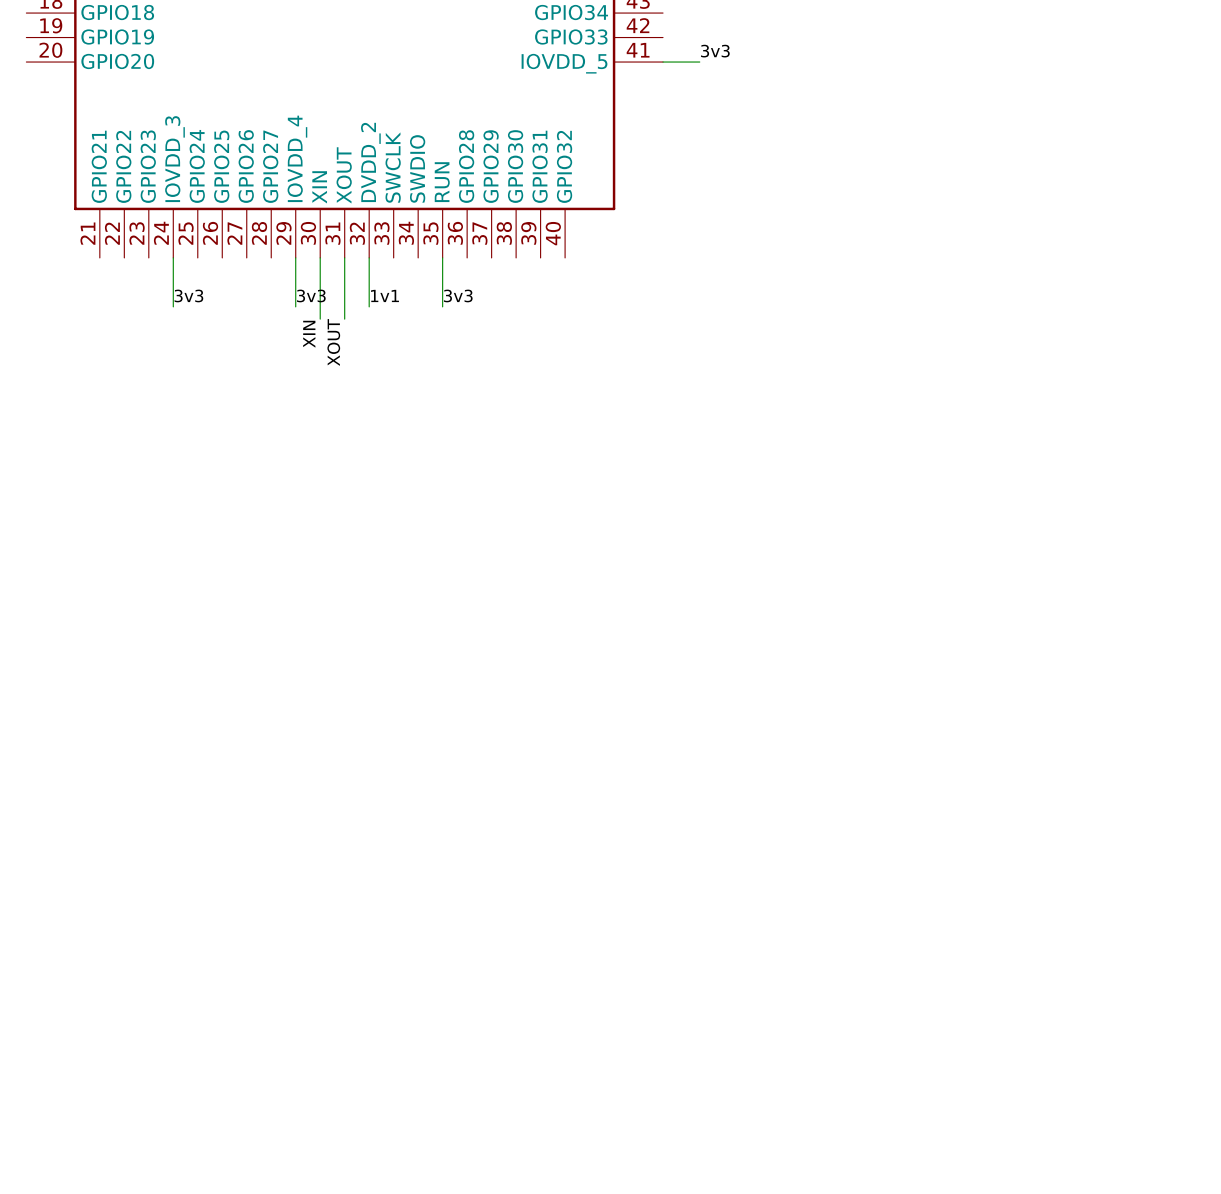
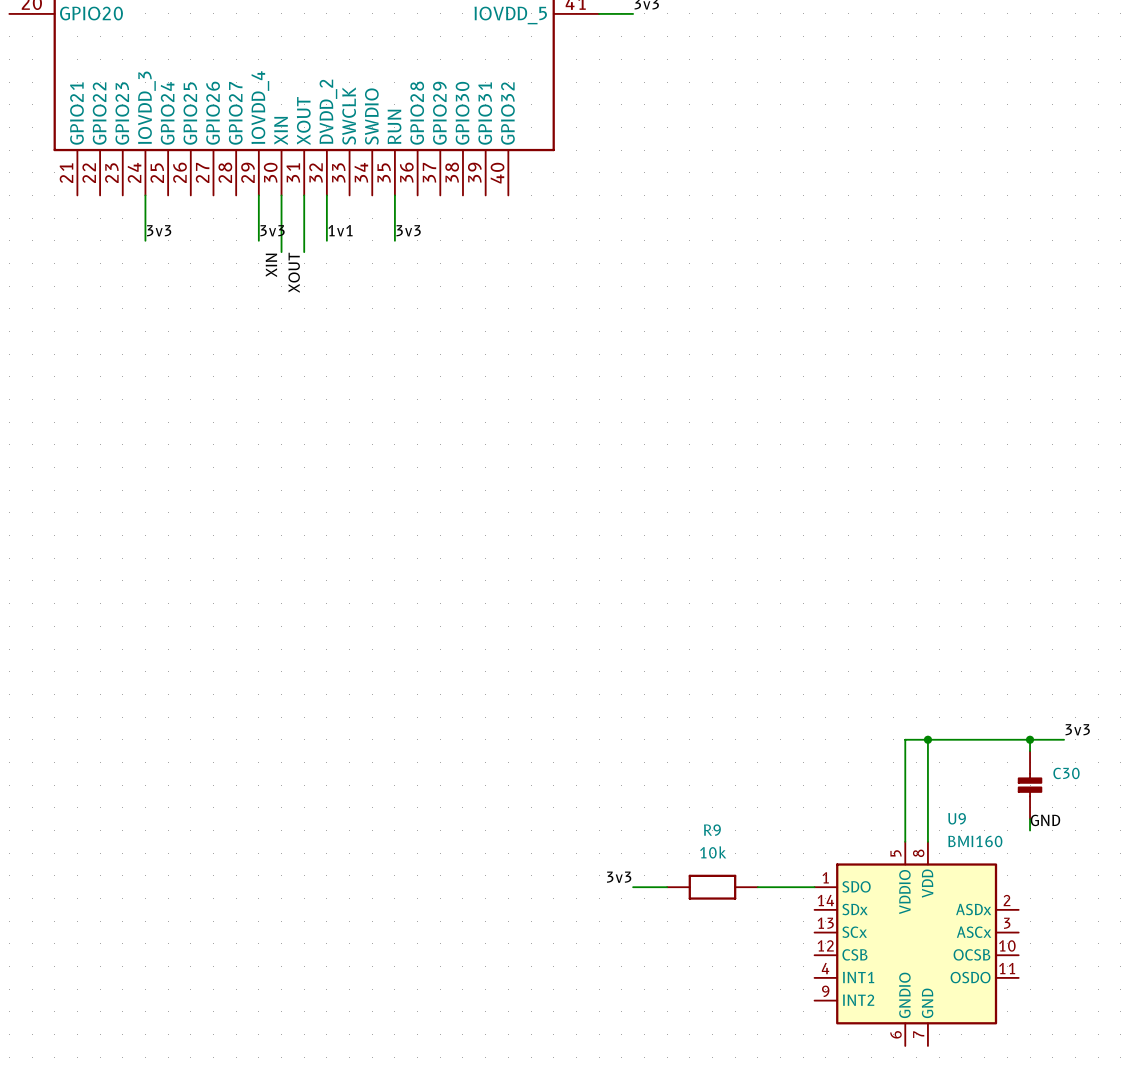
label: none -> 3v3 (1077, 729)
wire: none -> (927, 739) (927, 841)
junction: none -> (927, 739)
wire: none -> (1030, 739) (1030, 751)
junction: none -> (1030, 739)
wire: none -> (1064, 739) (905, 739) (905, 841)
C30: none -> (1030, 785)
wire: none -> (1030, 819) (1030, 830)
label: none -> GND (1045, 820)
label: none -> 3v3 (619, 877)
wire: none -> (633, 887) (667, 887)
R9: none -> 10k (712, 887)
wire: none -> (757, 887) (814, 887)
U9: none -> BMI160 (916, 943)

